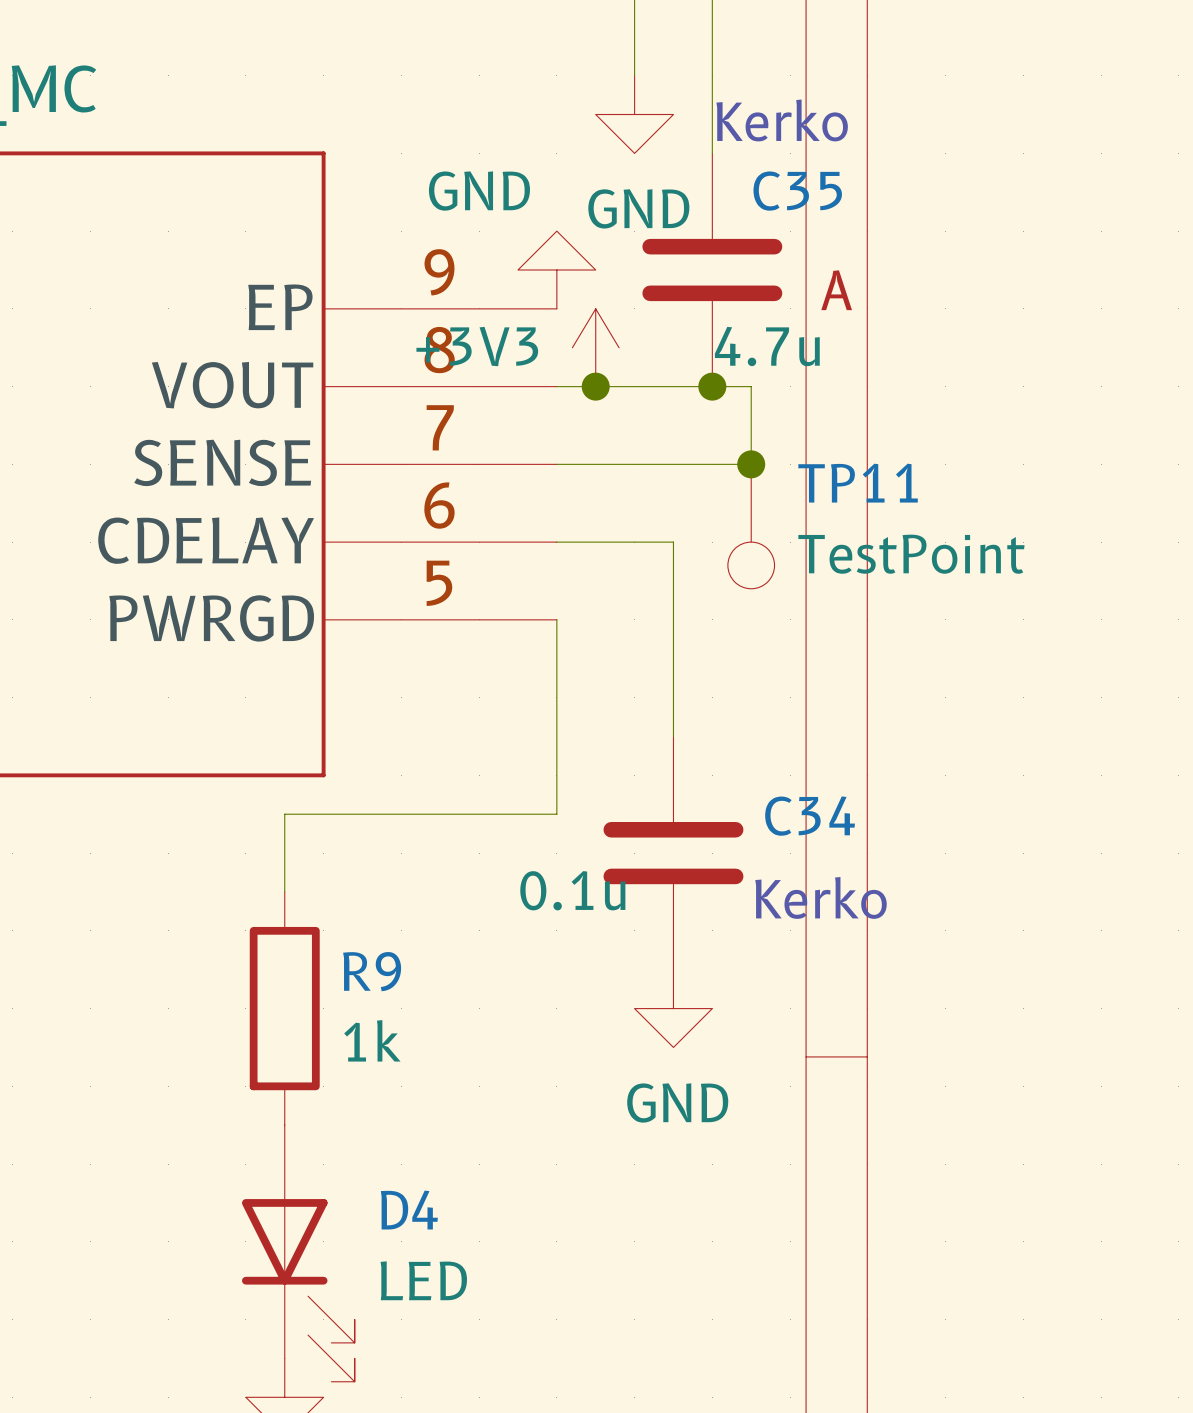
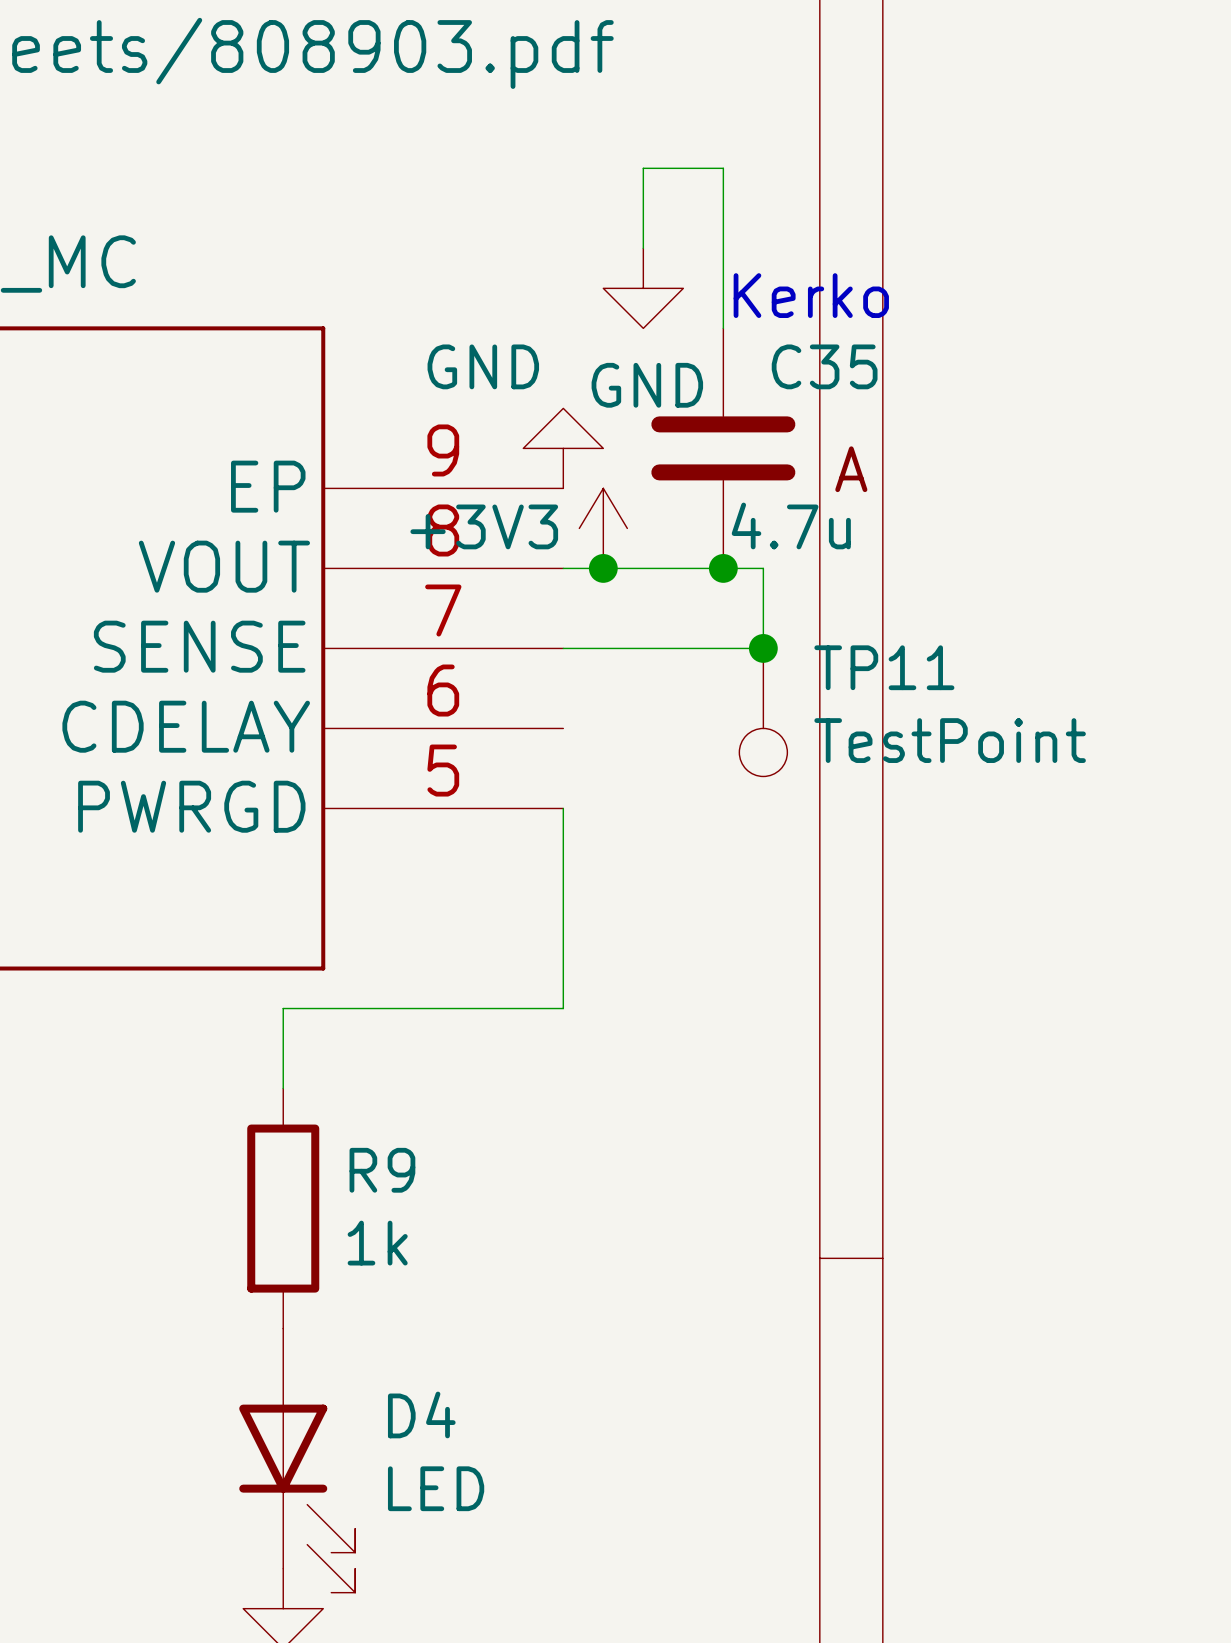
wire: (556, 542) (673, 542) (673, 736) -> none
C34: 0.1u (673, 853) -> none
text: Kerko (821, 897) -> none
power symbol: GND (673, 1008) -> none

